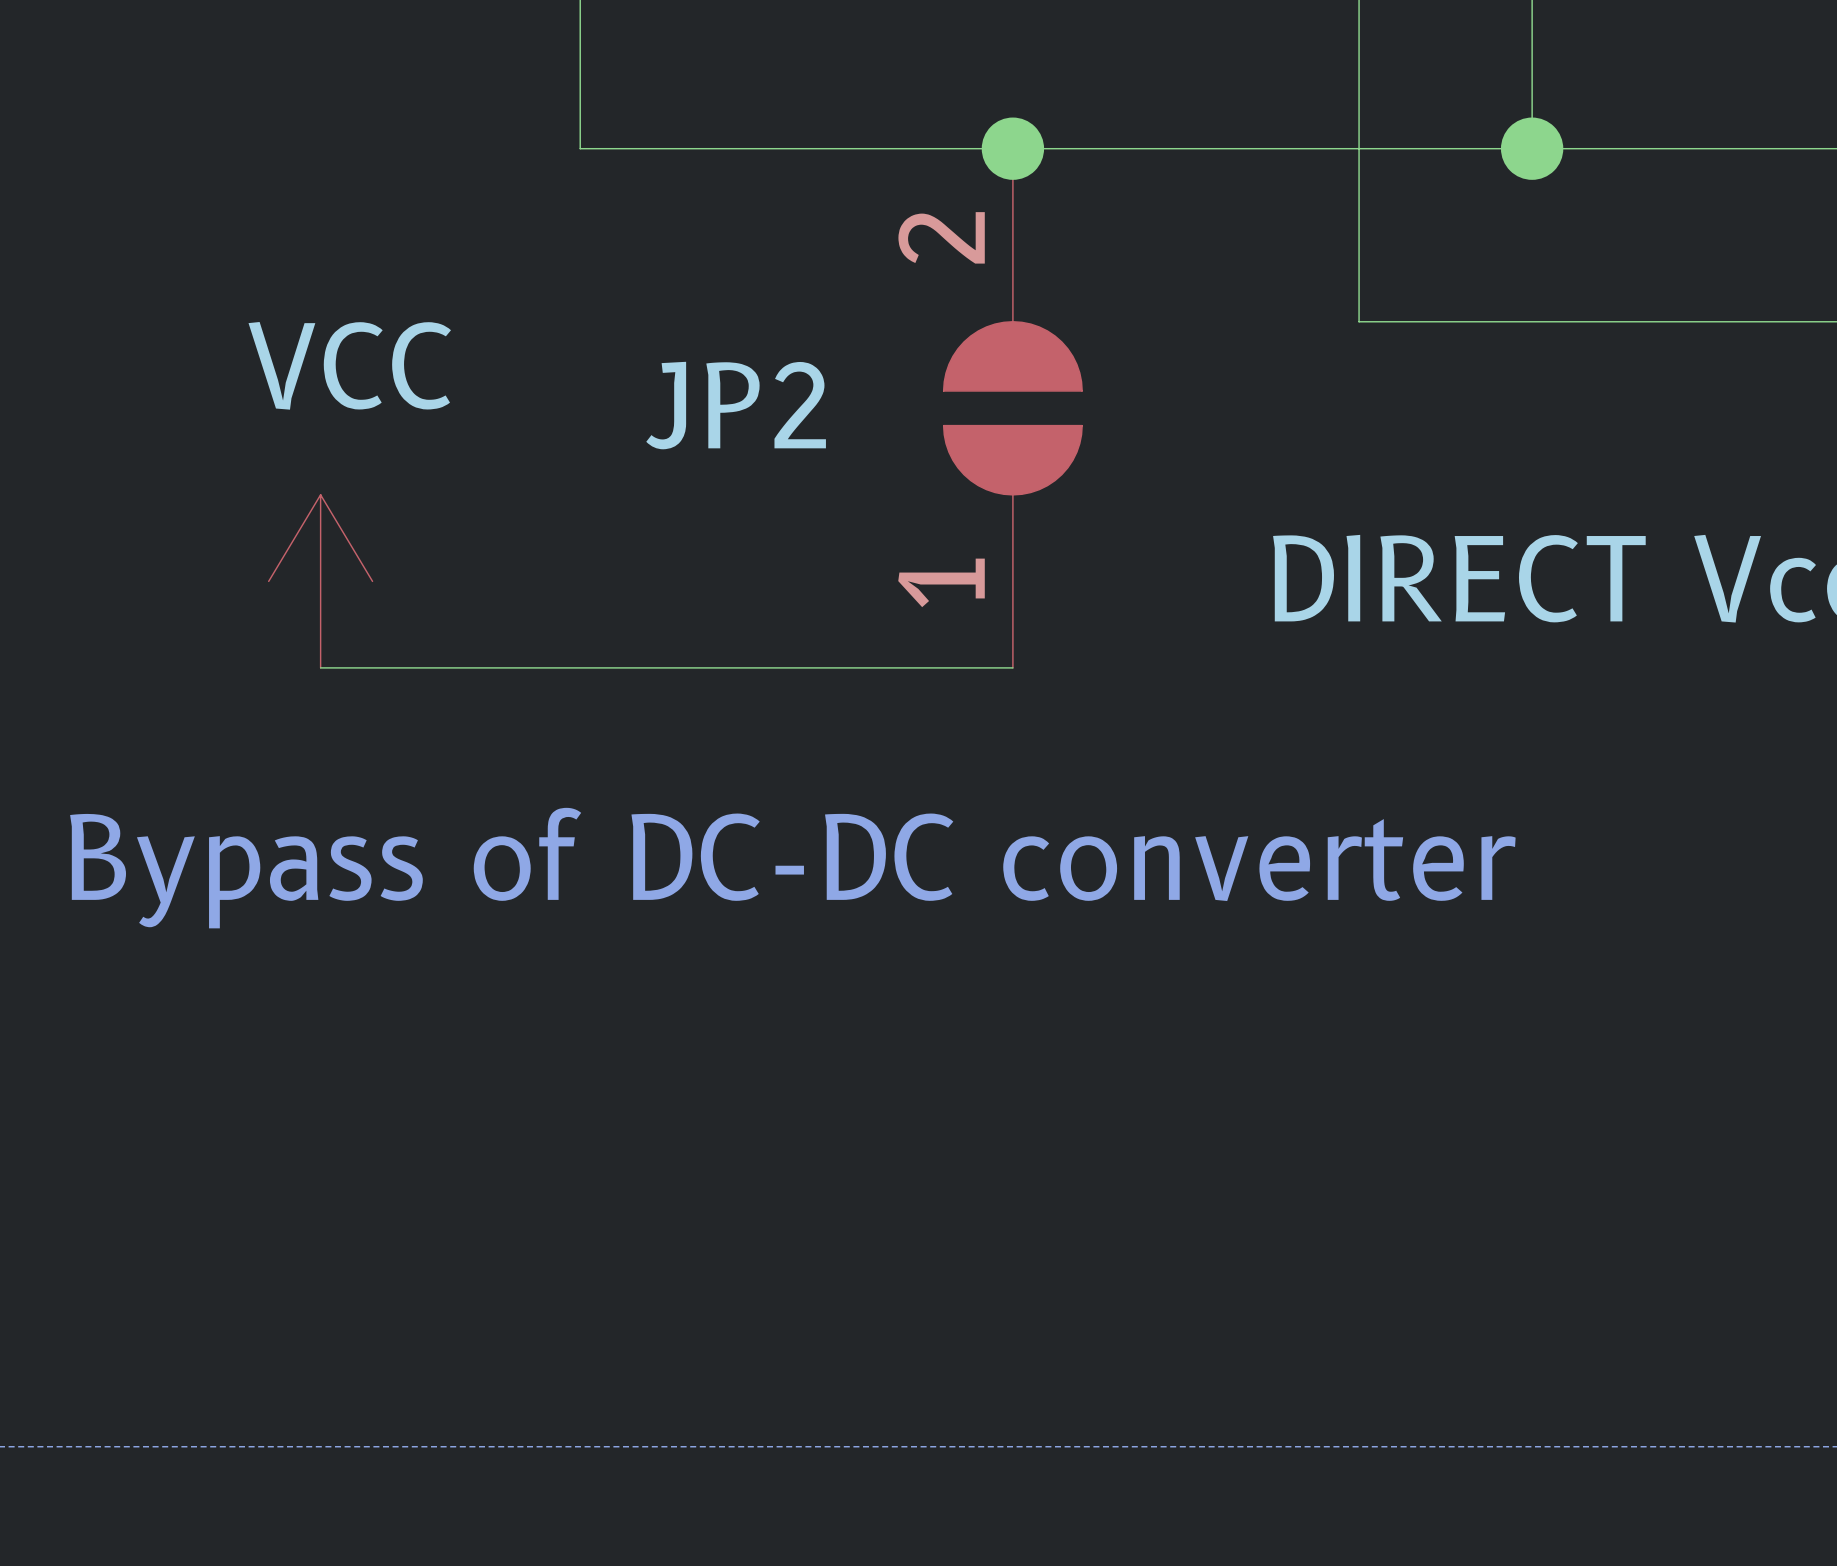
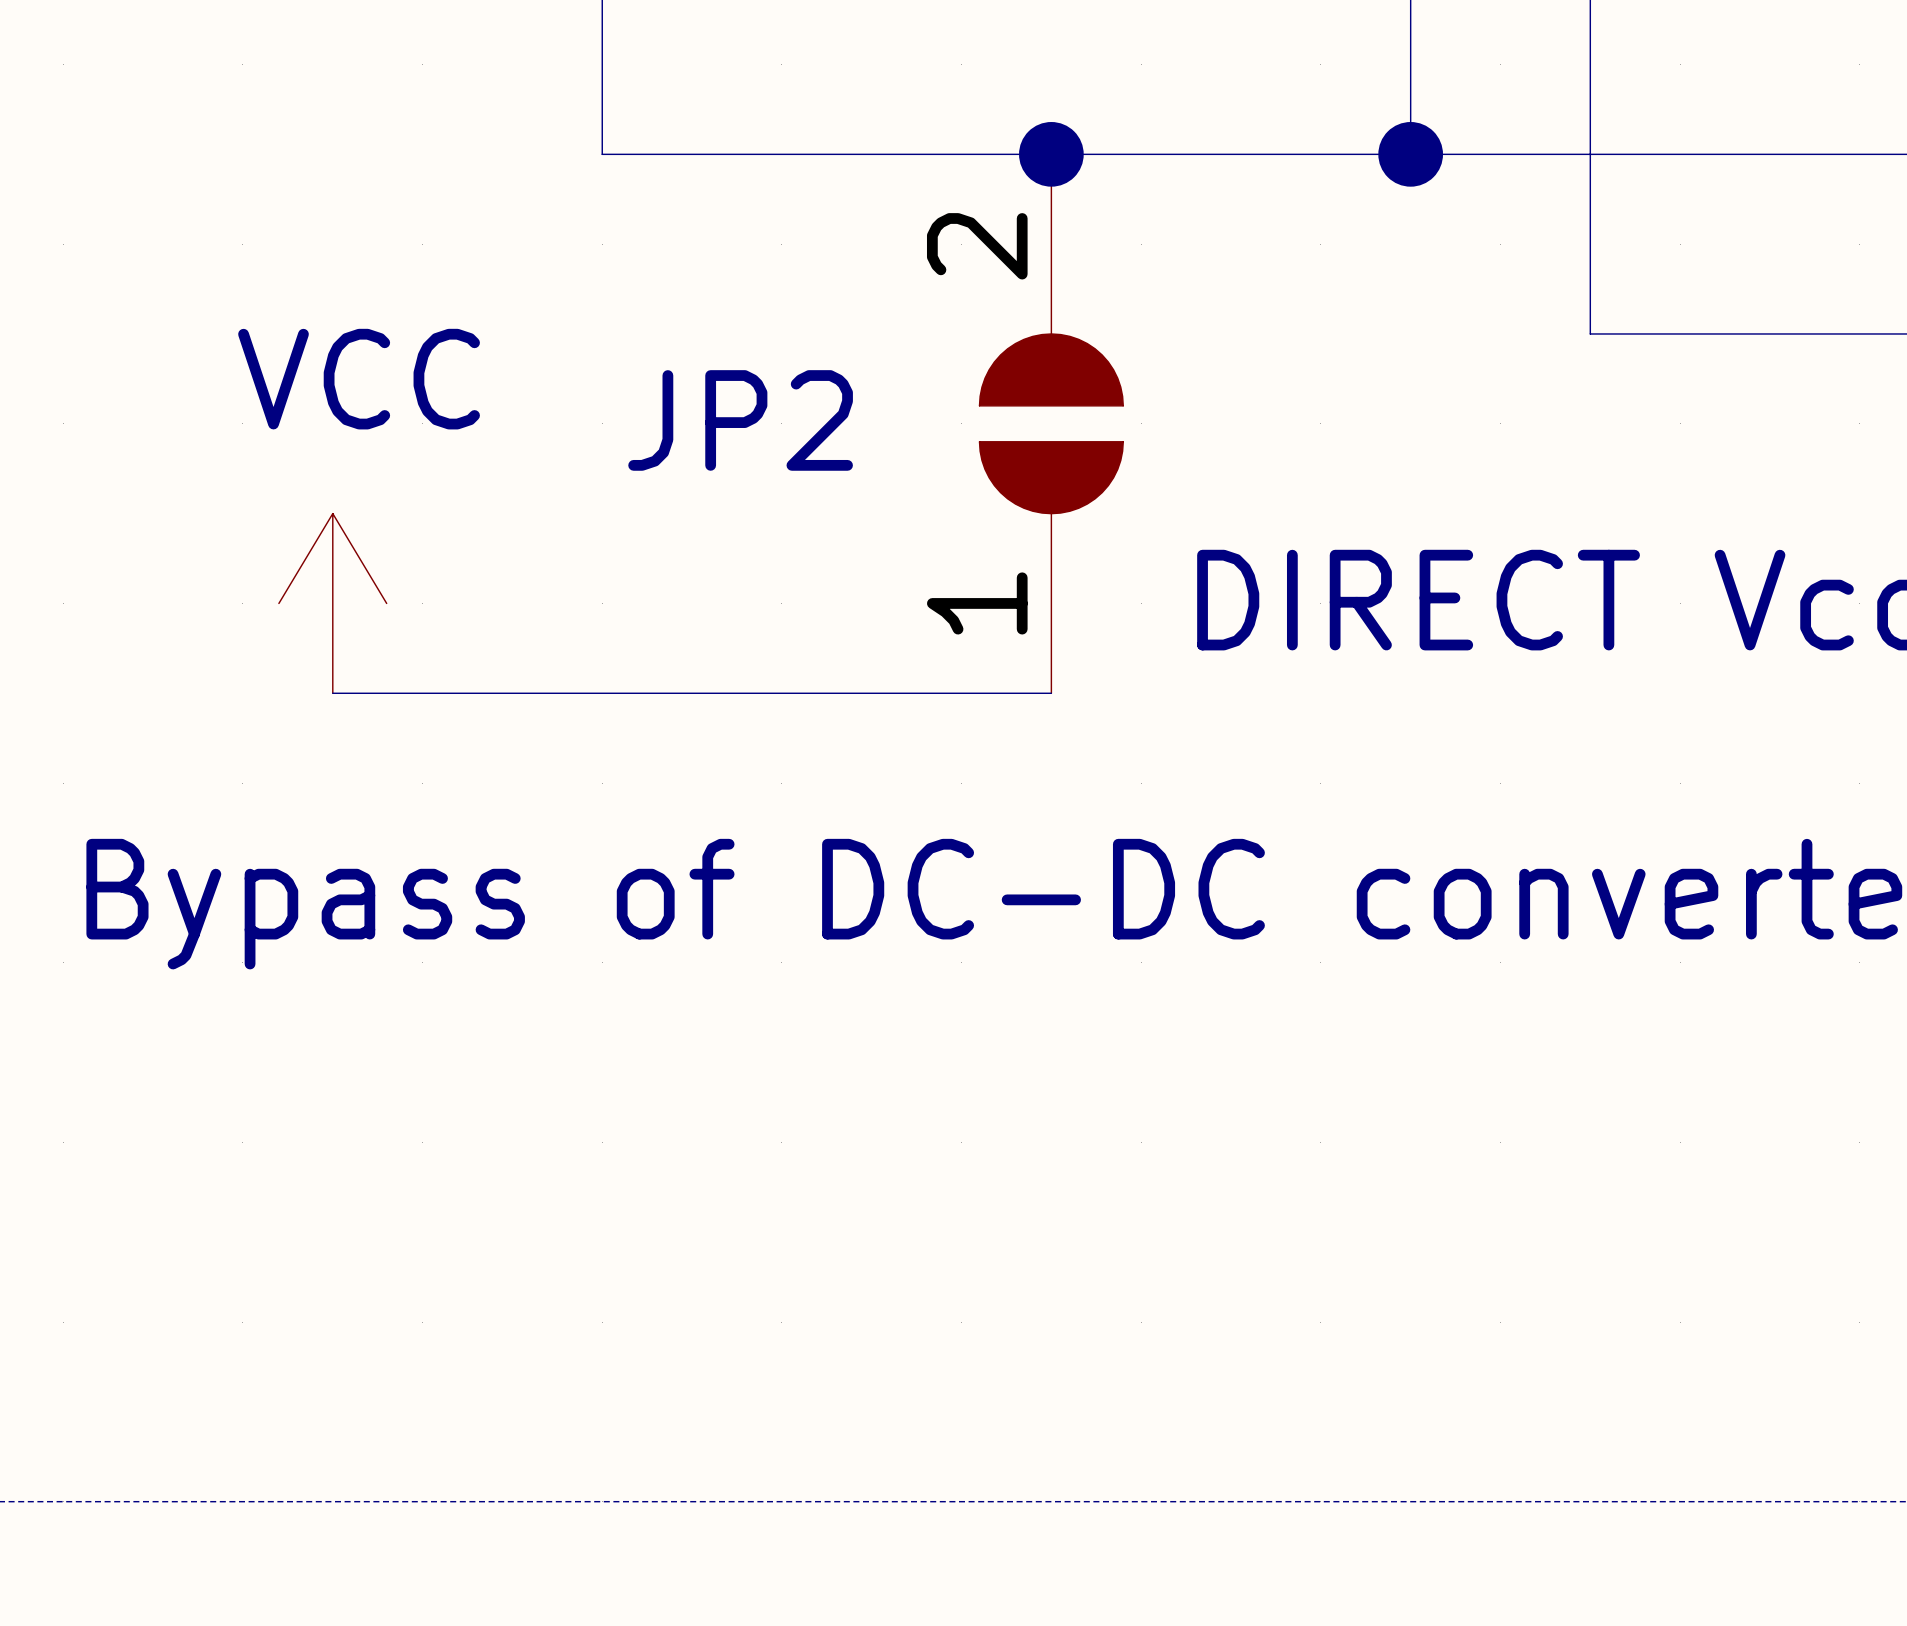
wire: (1359, 148) (1359, 321) (1532, 321) -> (1590, 154) (1590, 333)
junction position: (1532, 148) -> (1410, 154)

